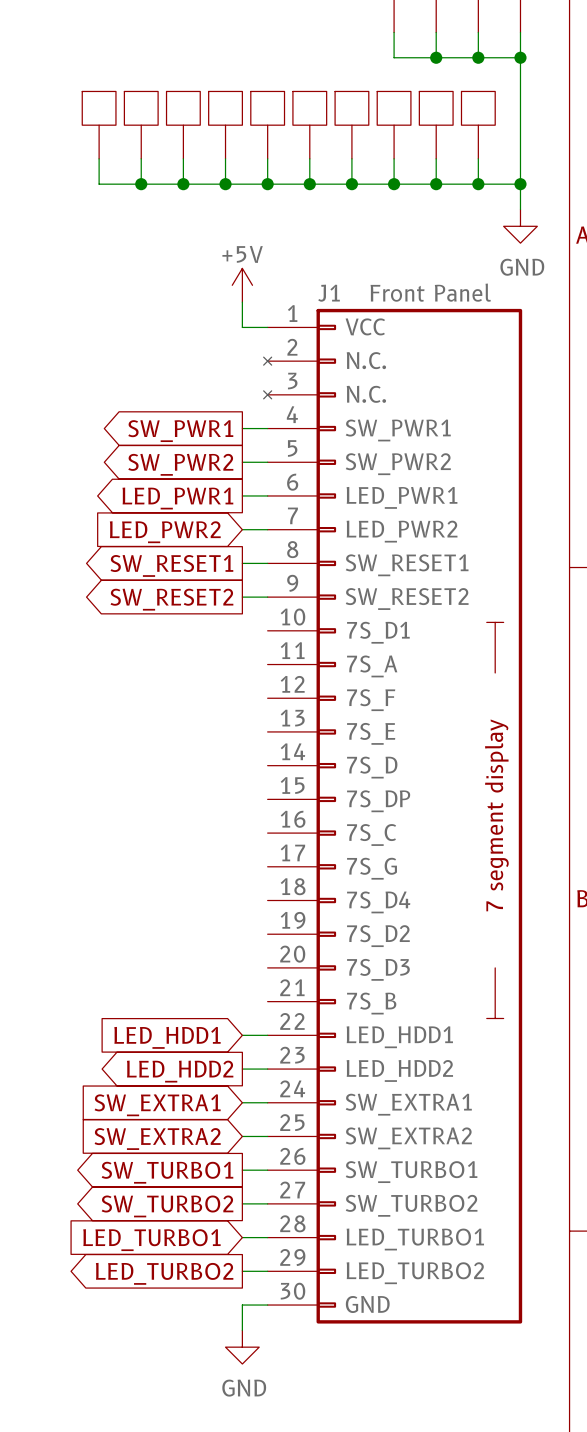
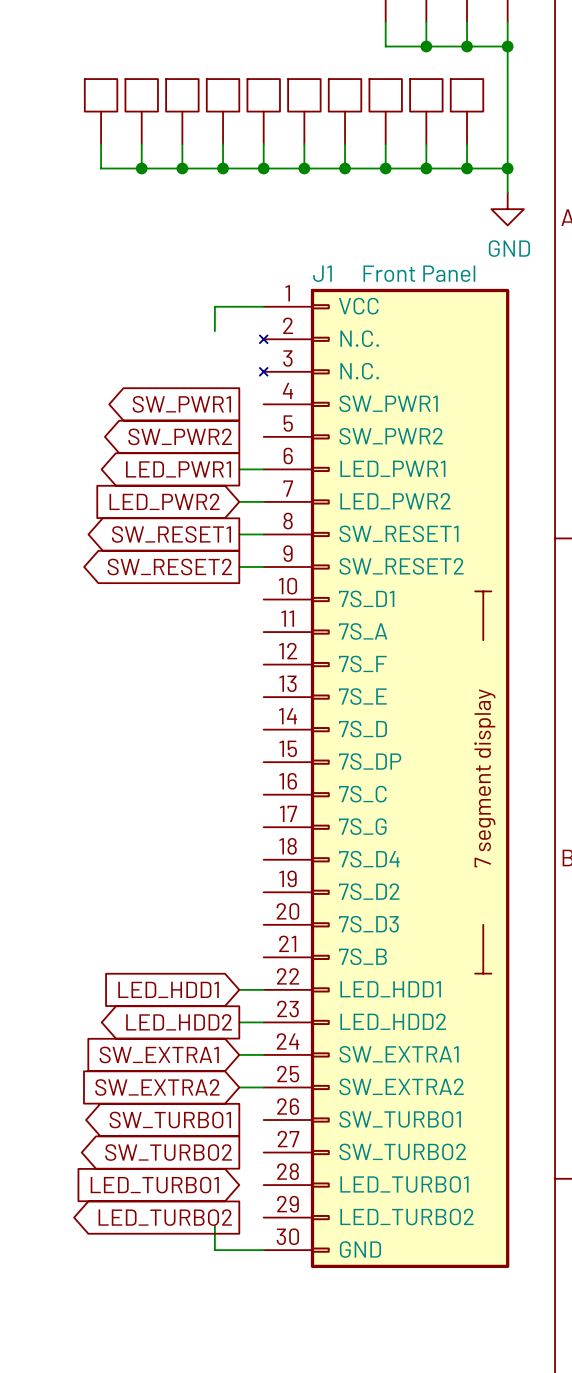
power symbol: +5V (242, 285) -> none
wire: (242, 302) (242, 327) -> (214, 331) (214, 306) (239, 306)
wire: (242, 428) (267, 428) -> none
wire: (242, 462) (267, 462) -> none
wire: (242, 1170) (267, 1170) -> none
wire: (242, 1203) (267, 1203) -> none
wire: (242, 1237) (267, 1237) -> none
wire: (242, 1271) (267, 1271) -> none
wire: (242, 1305) (242, 1330) -> (239, 1250) (214, 1250) (214, 1225)
power symbol: GND (242, 1347) -> none

